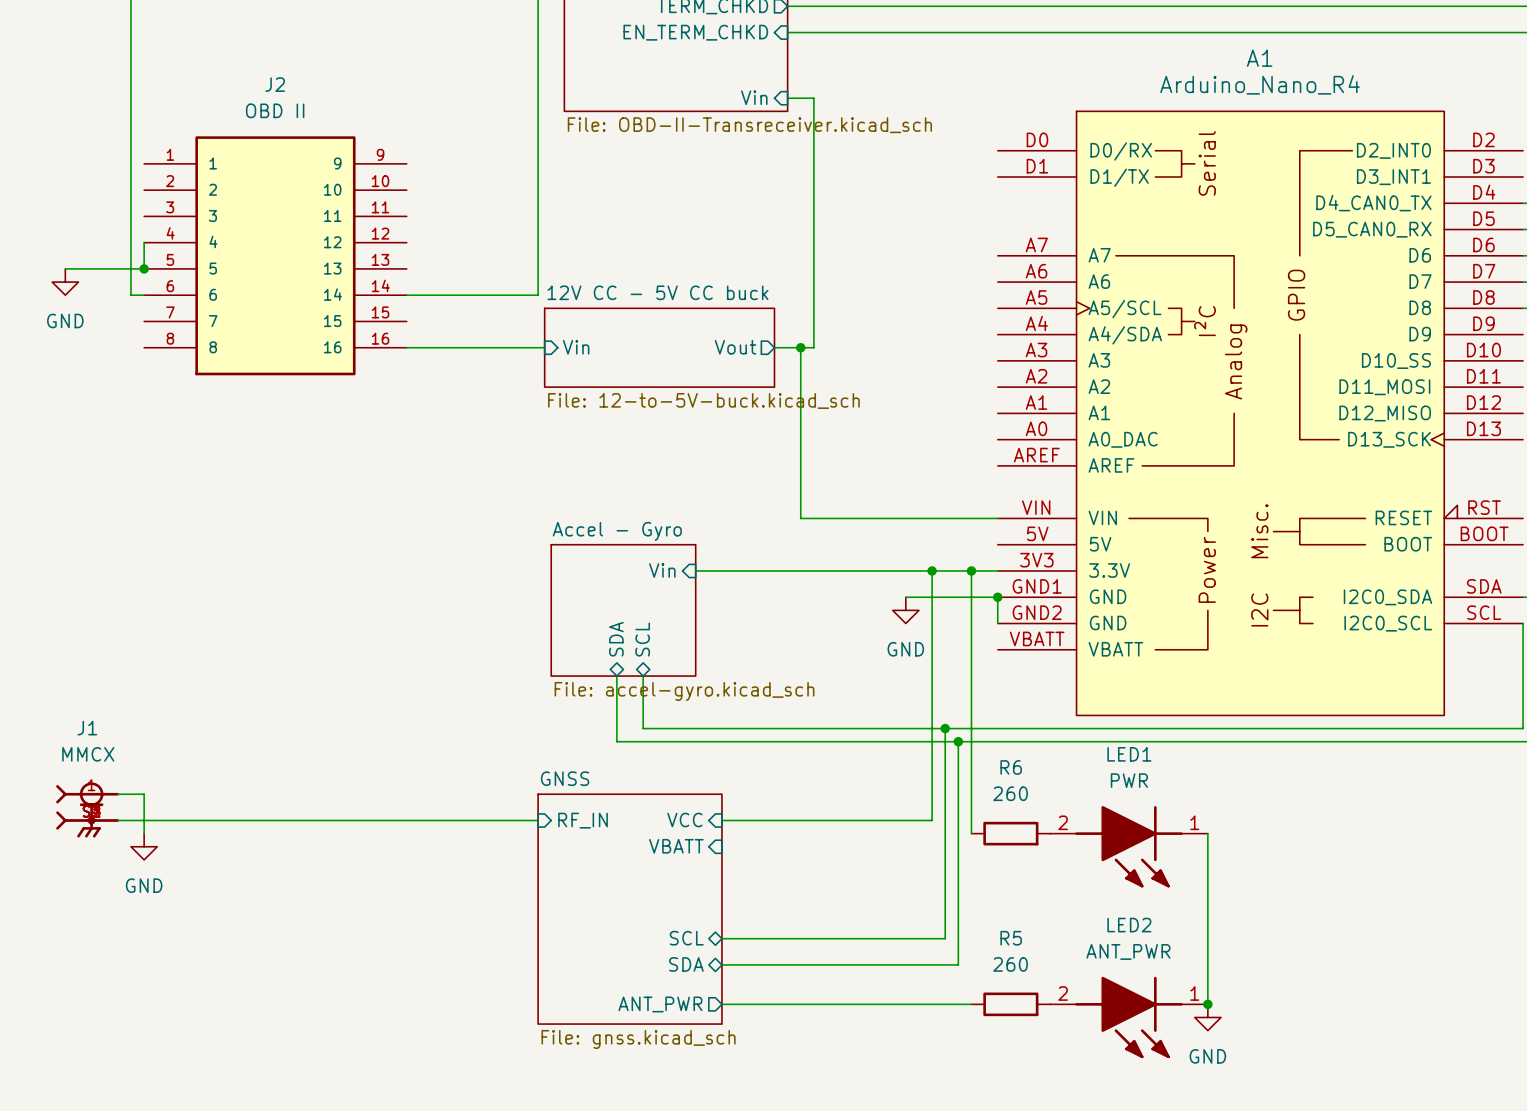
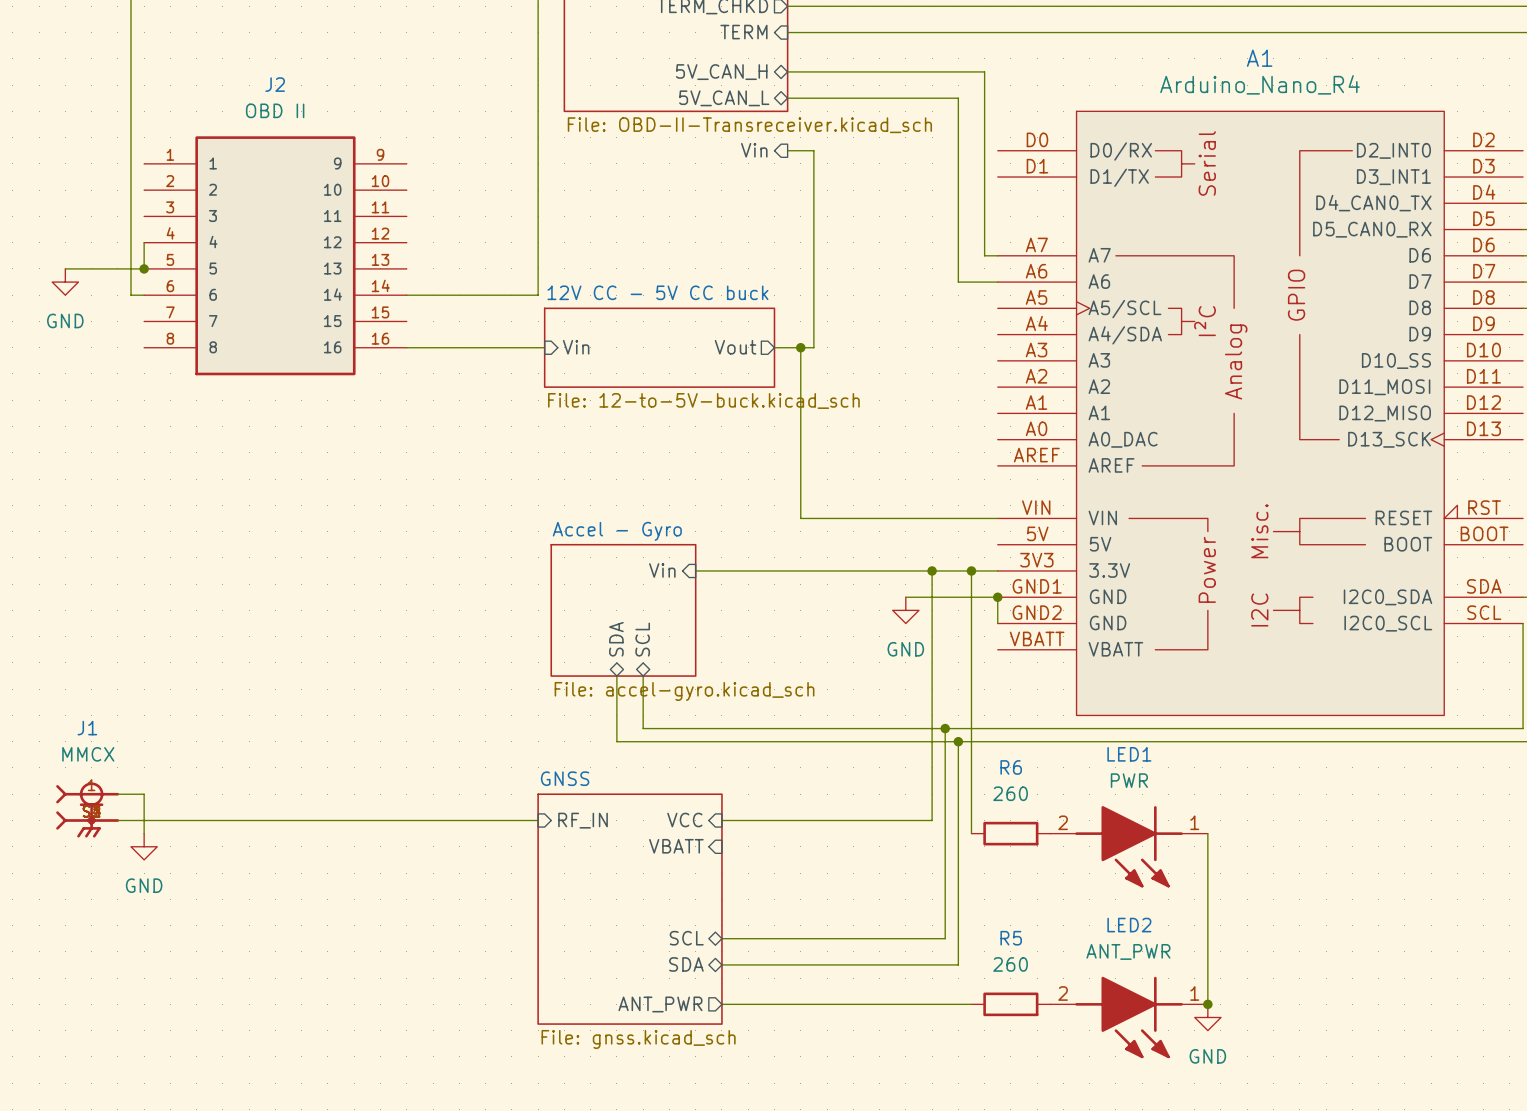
sheet pin: EN_TERM_CHKD (695, 32) -> TERM (743, 32)
wire: none -> (787, 71) (984, 71) (984, 255) (997, 255)
sheet pin: none -> 5V_CAN_H (721, 72)
sheet pin shape: input (754, 97) -> bidirectional (724, 98)
sheet pin: Vin (754, 97) -> 5V_CAN_L (724, 98)
wire: (813, 98) (813, 150) -> (787, 150) (813, 150)
wire: none -> (813, 98) (958, 98) (958, 282) (997, 282)
sheet pin: none -> Vin (754, 150)

